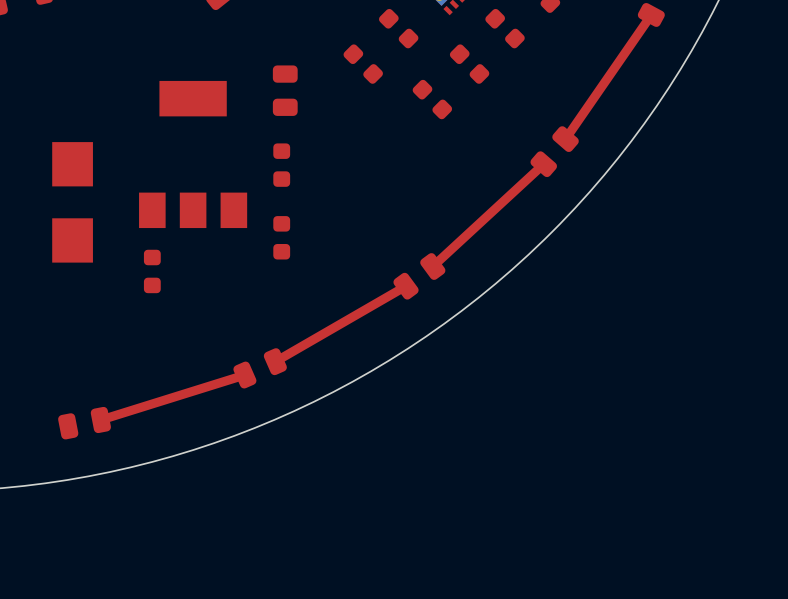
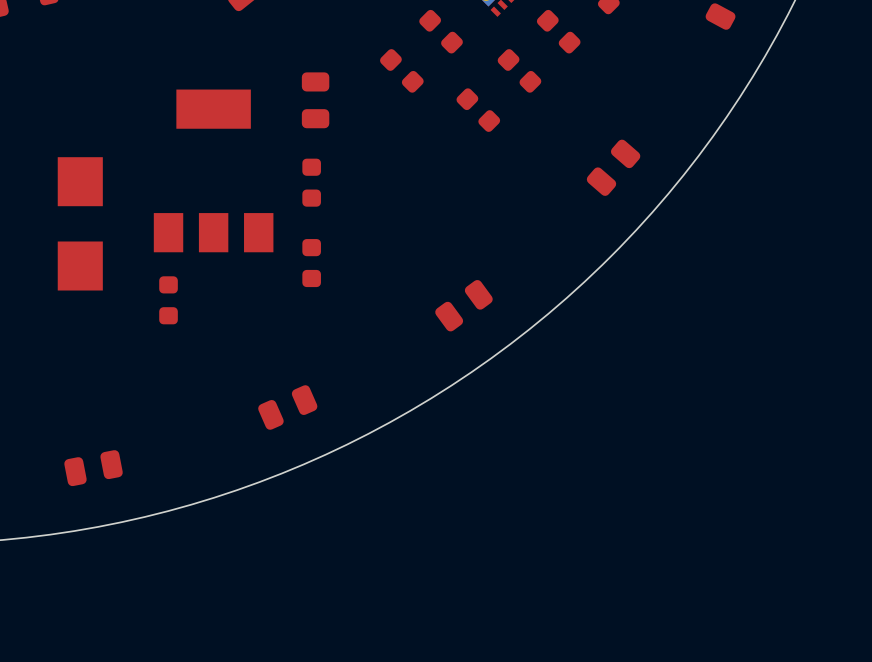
top track: (651, 14) (565, 139) -> none
top track: (543, 164) (432, 266) -> none
top track: (406, 286) (275, 361) -> none
top track: (244, 375) (100, 420) -> none

